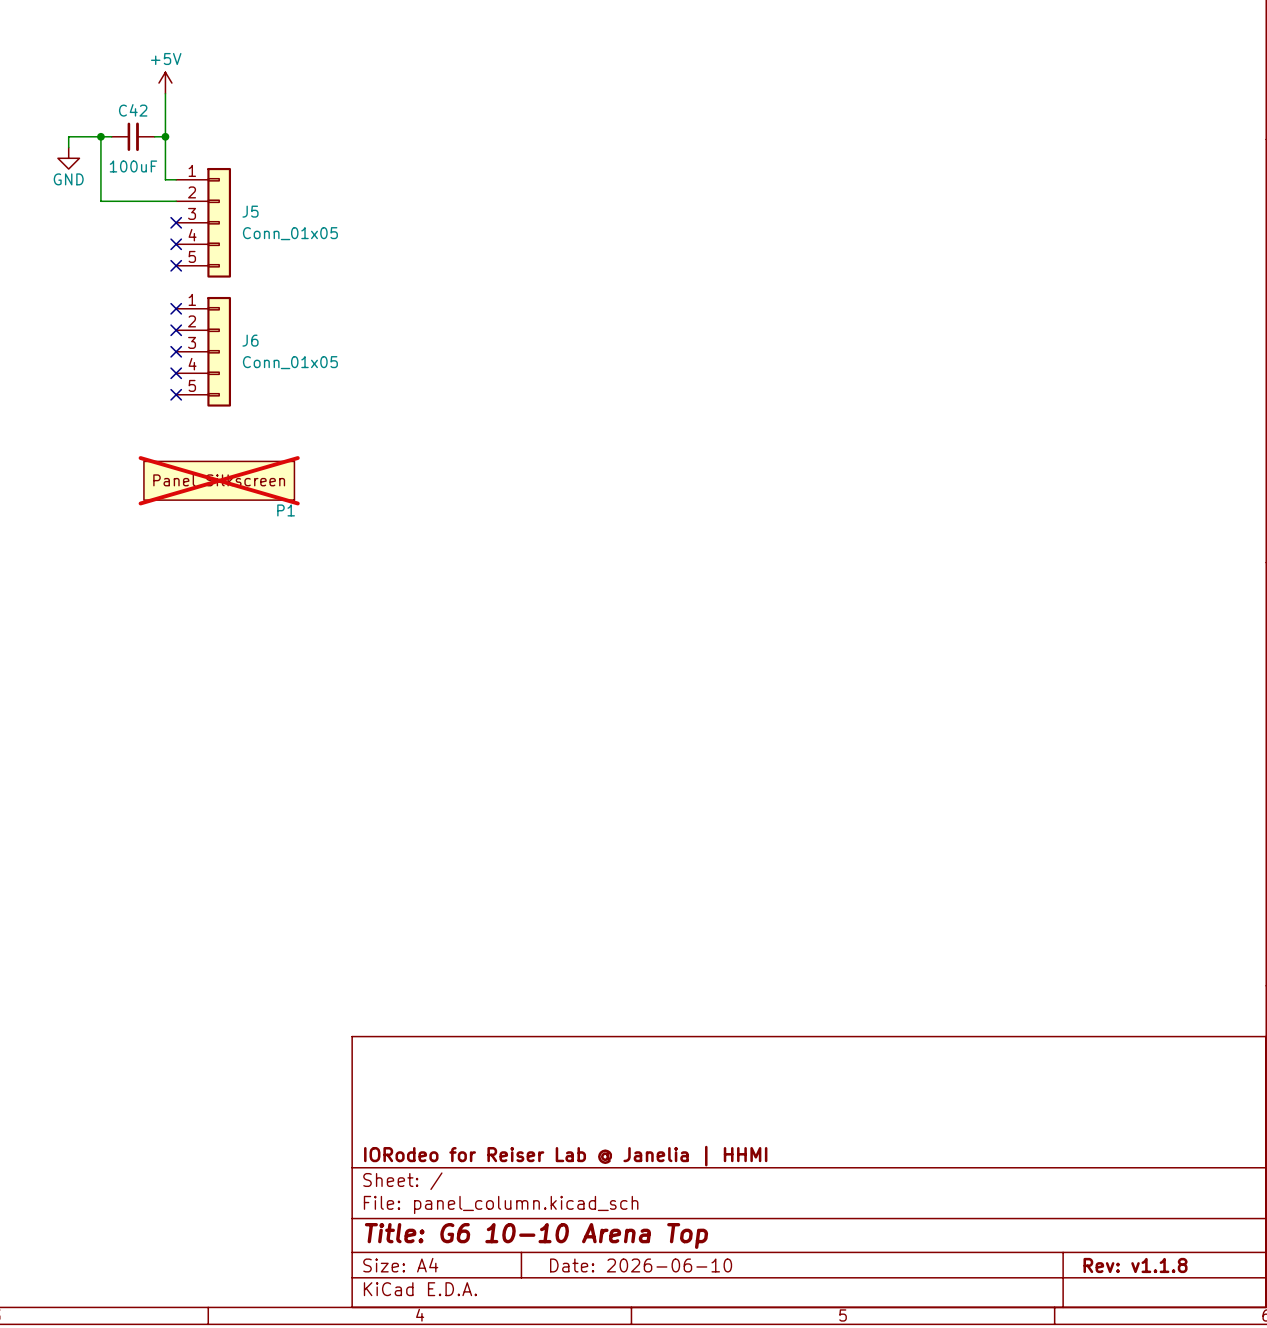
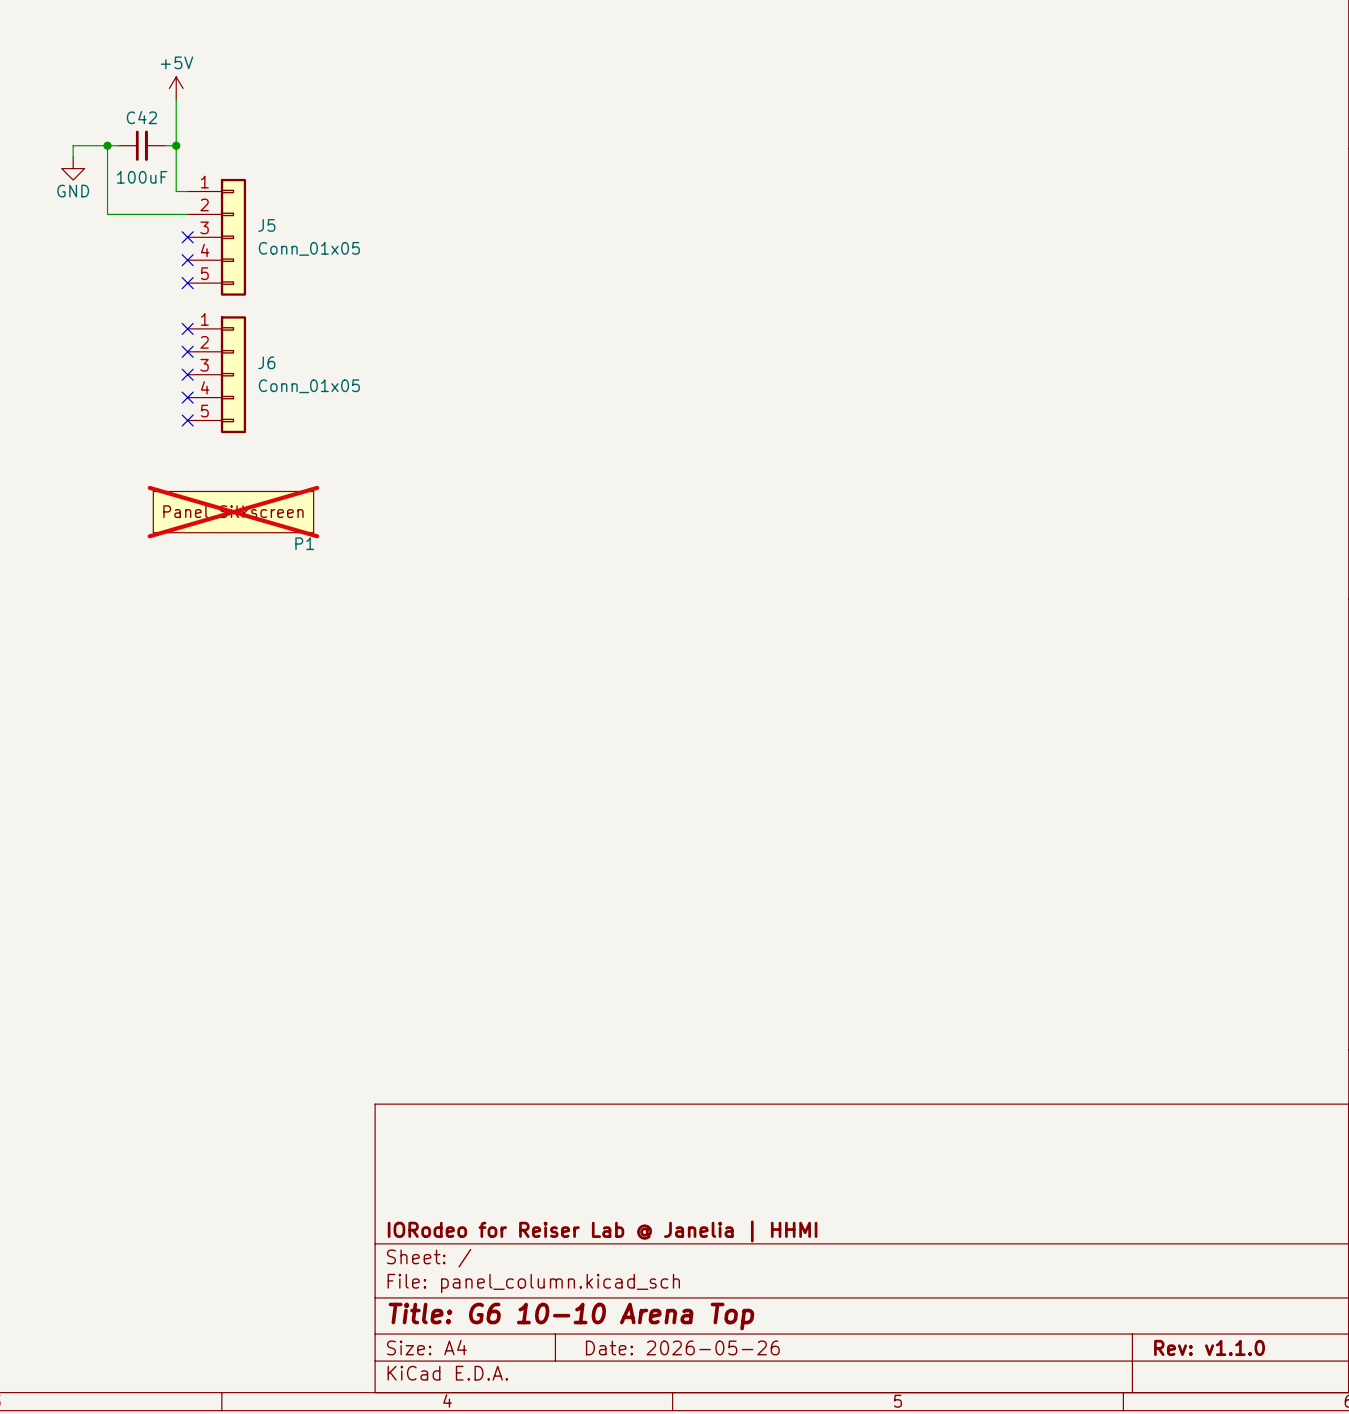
title block: Date: 2026-06-10 (641, 1265) -> Date: 2026-05-26 (682, 1347)
title block: Rev: v1.1.8 (1135, 1265) -> Rev: v1.1.0 (1209, 1347)

